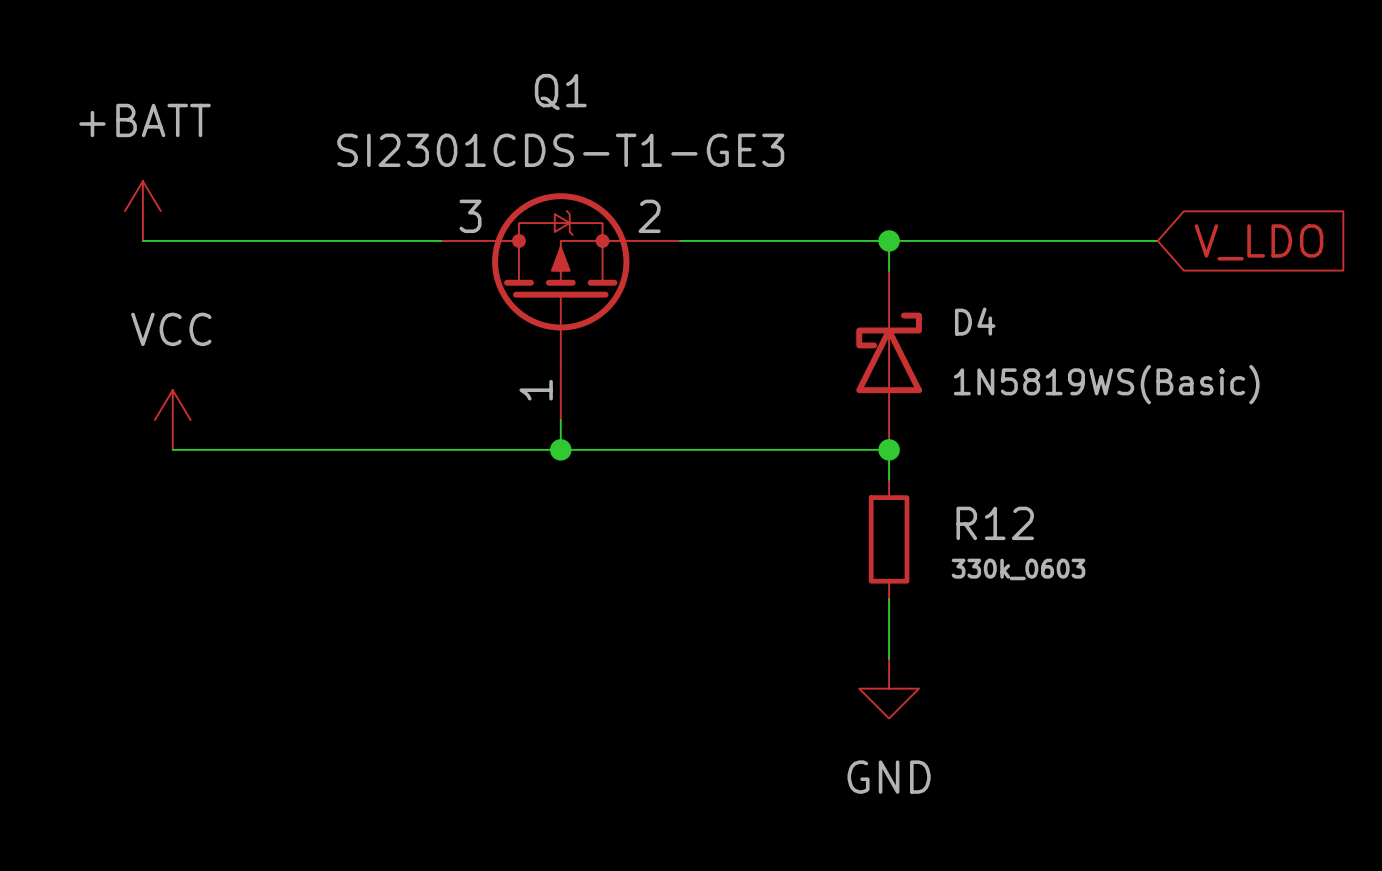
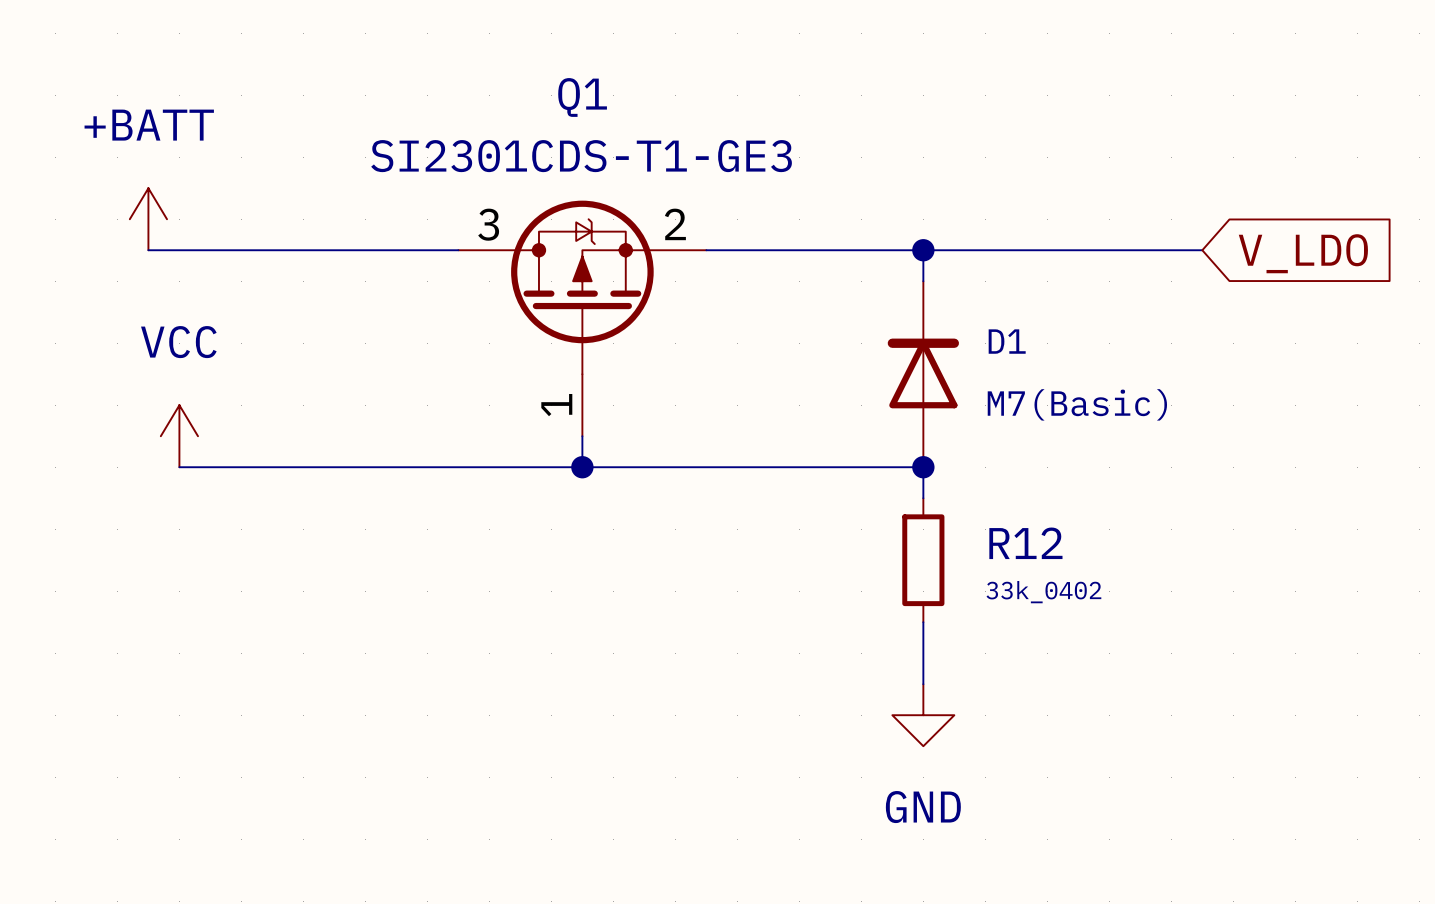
D4: 1N5819WS(Basic) (889, 360) -> none
D1: none -> M7(Basic) (923, 374)
R12 value: 330k_0603 (1018, 569) -> 33k_0402 (1043, 592)

